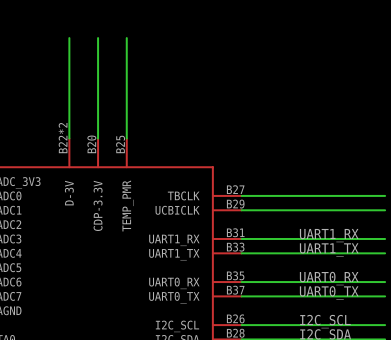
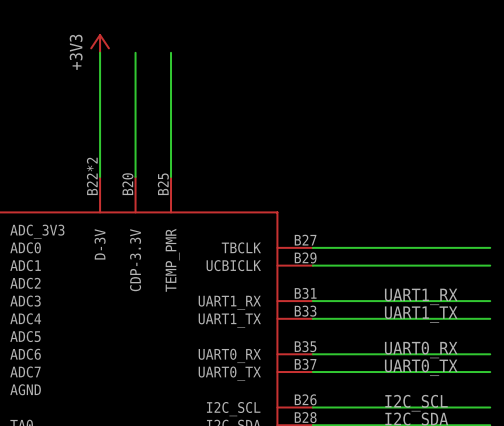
power symbol: none -> +3V3 (100, 43)

